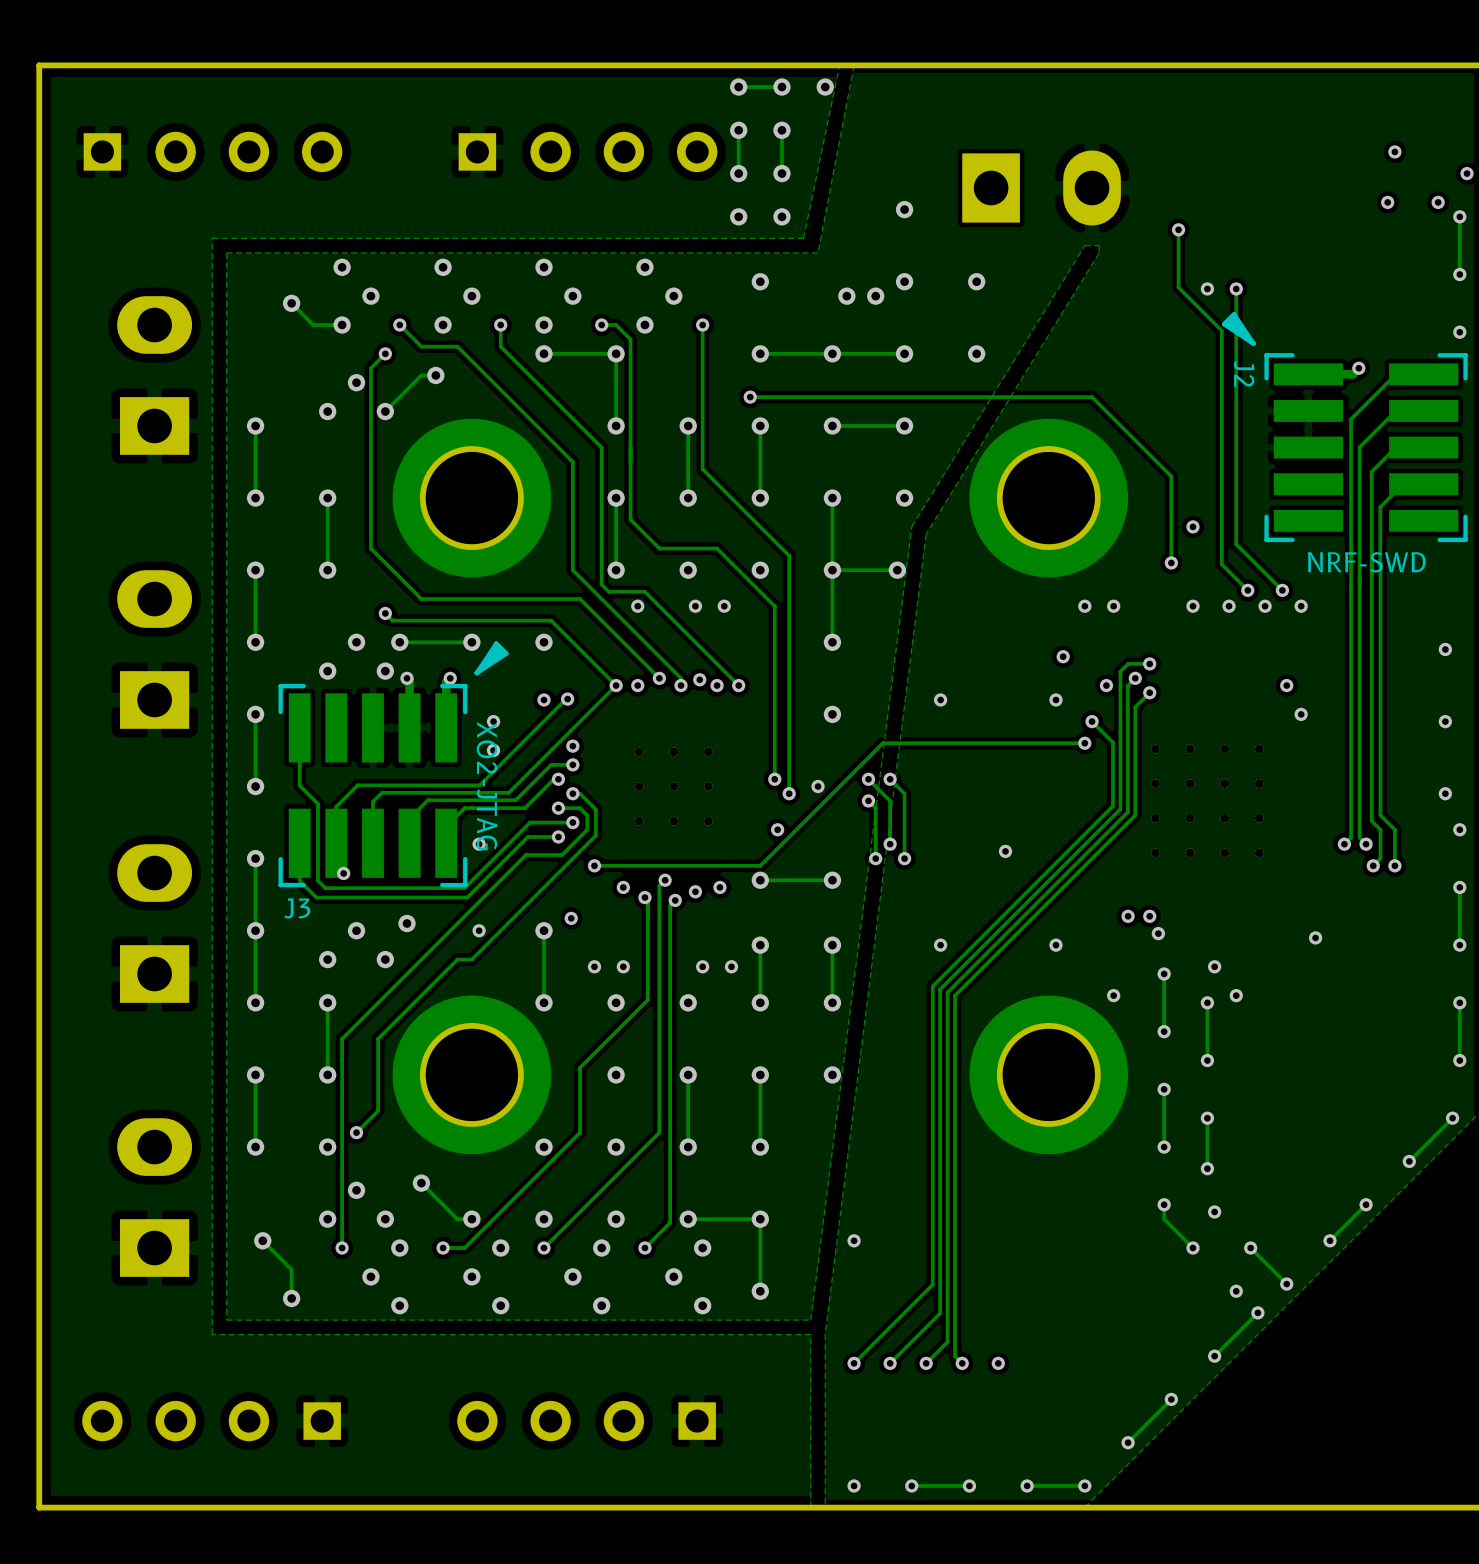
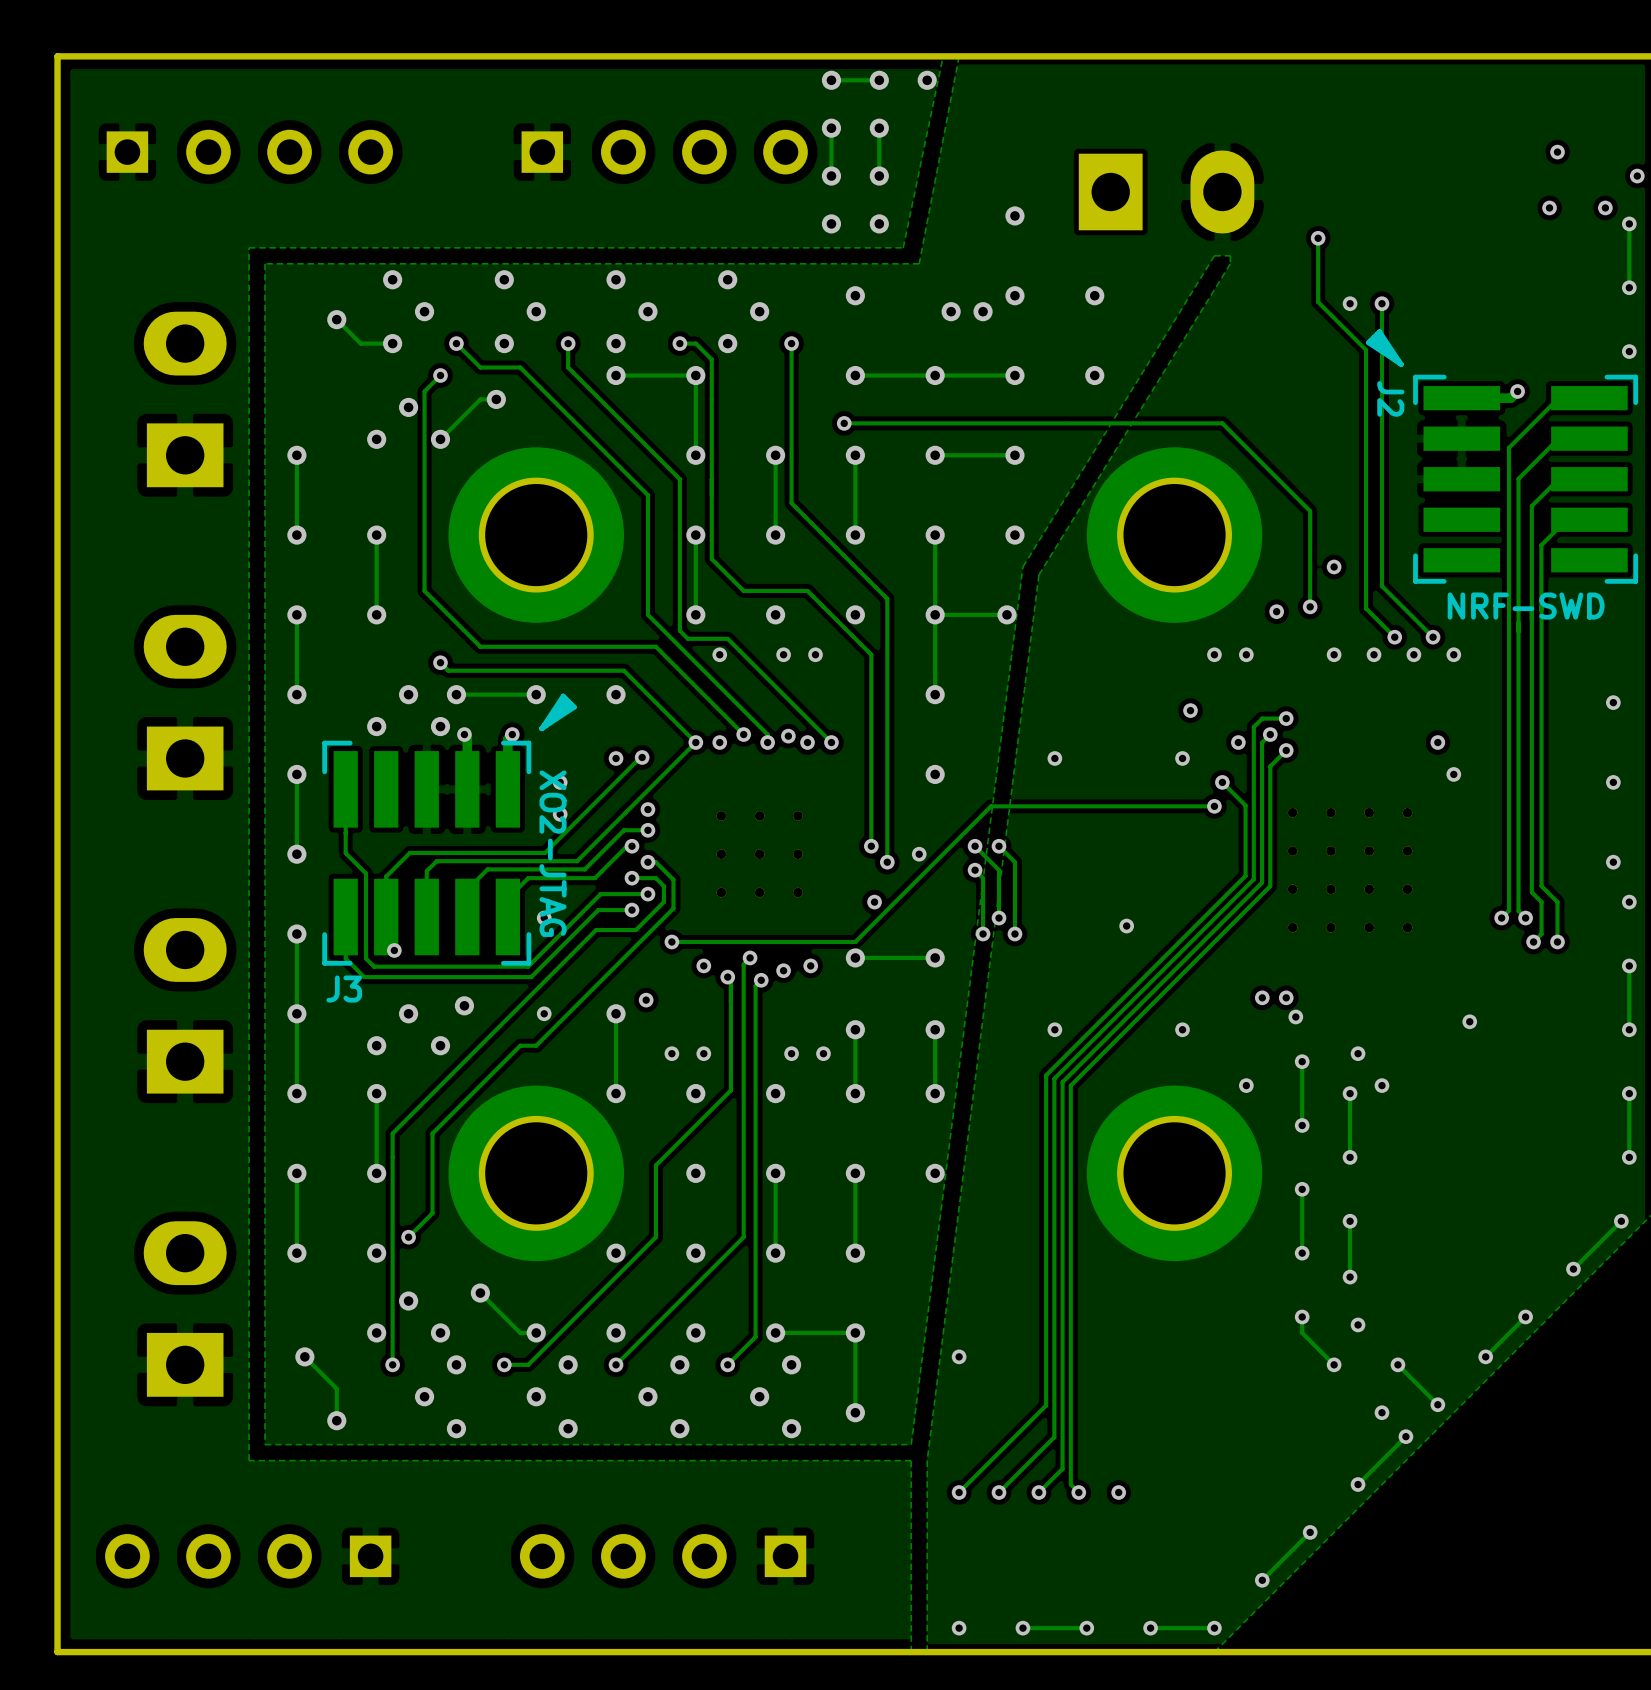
via: none -> (1276, 611)

